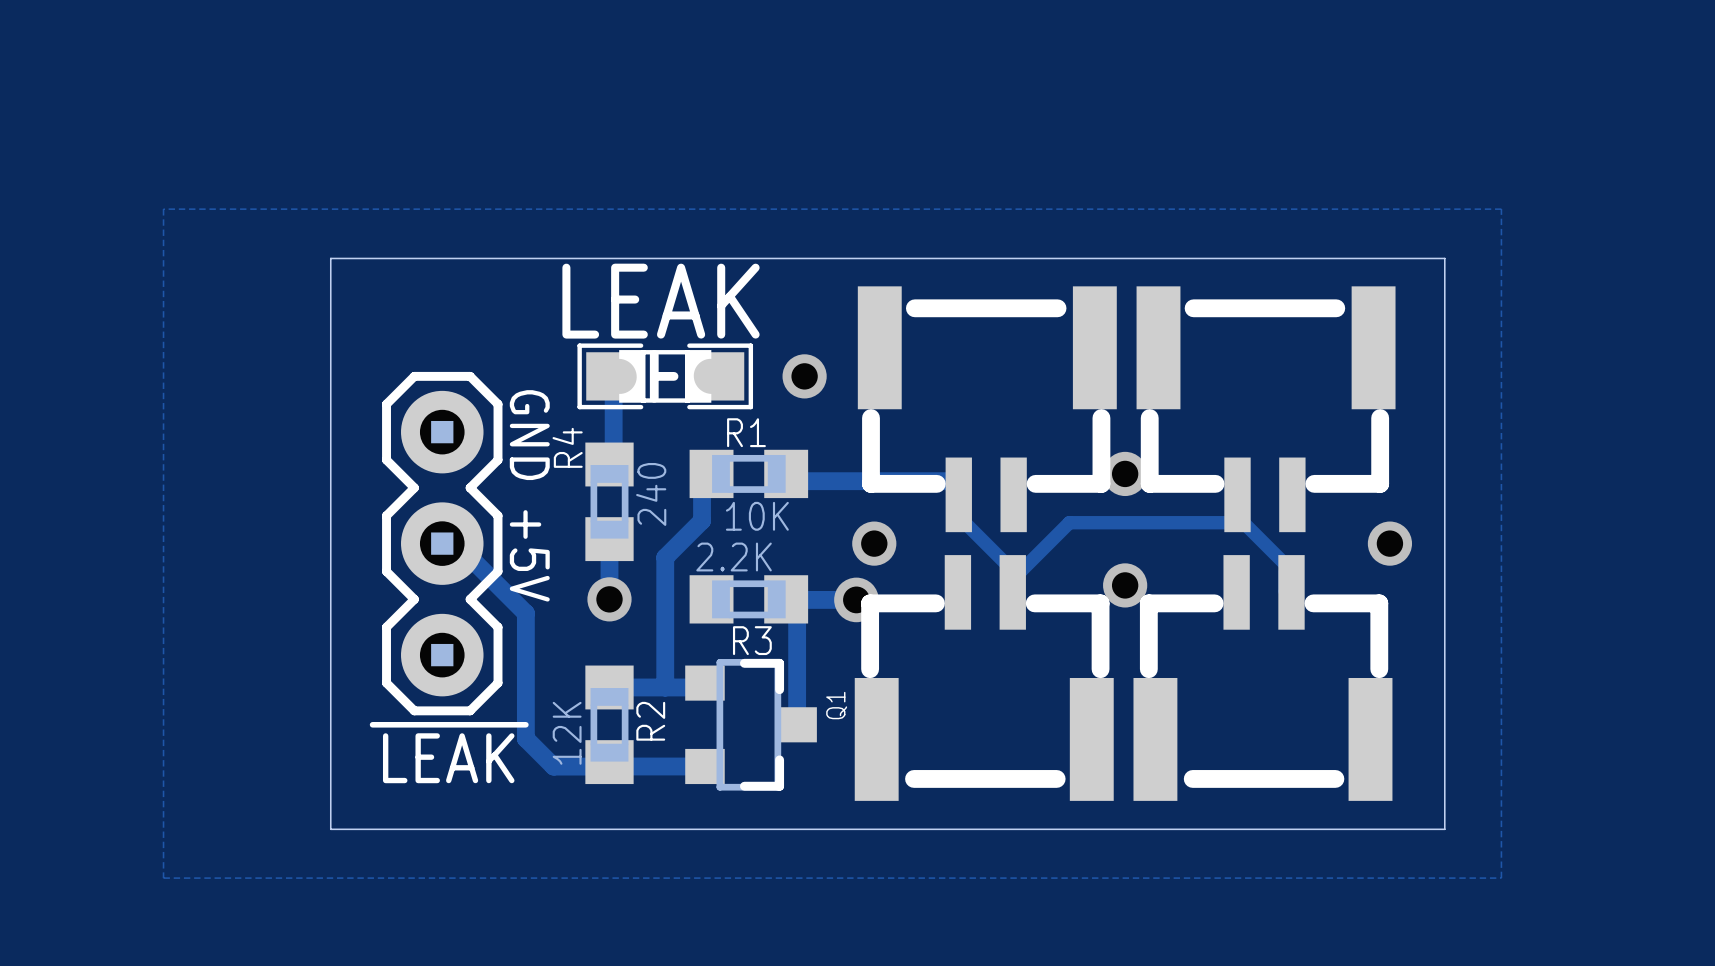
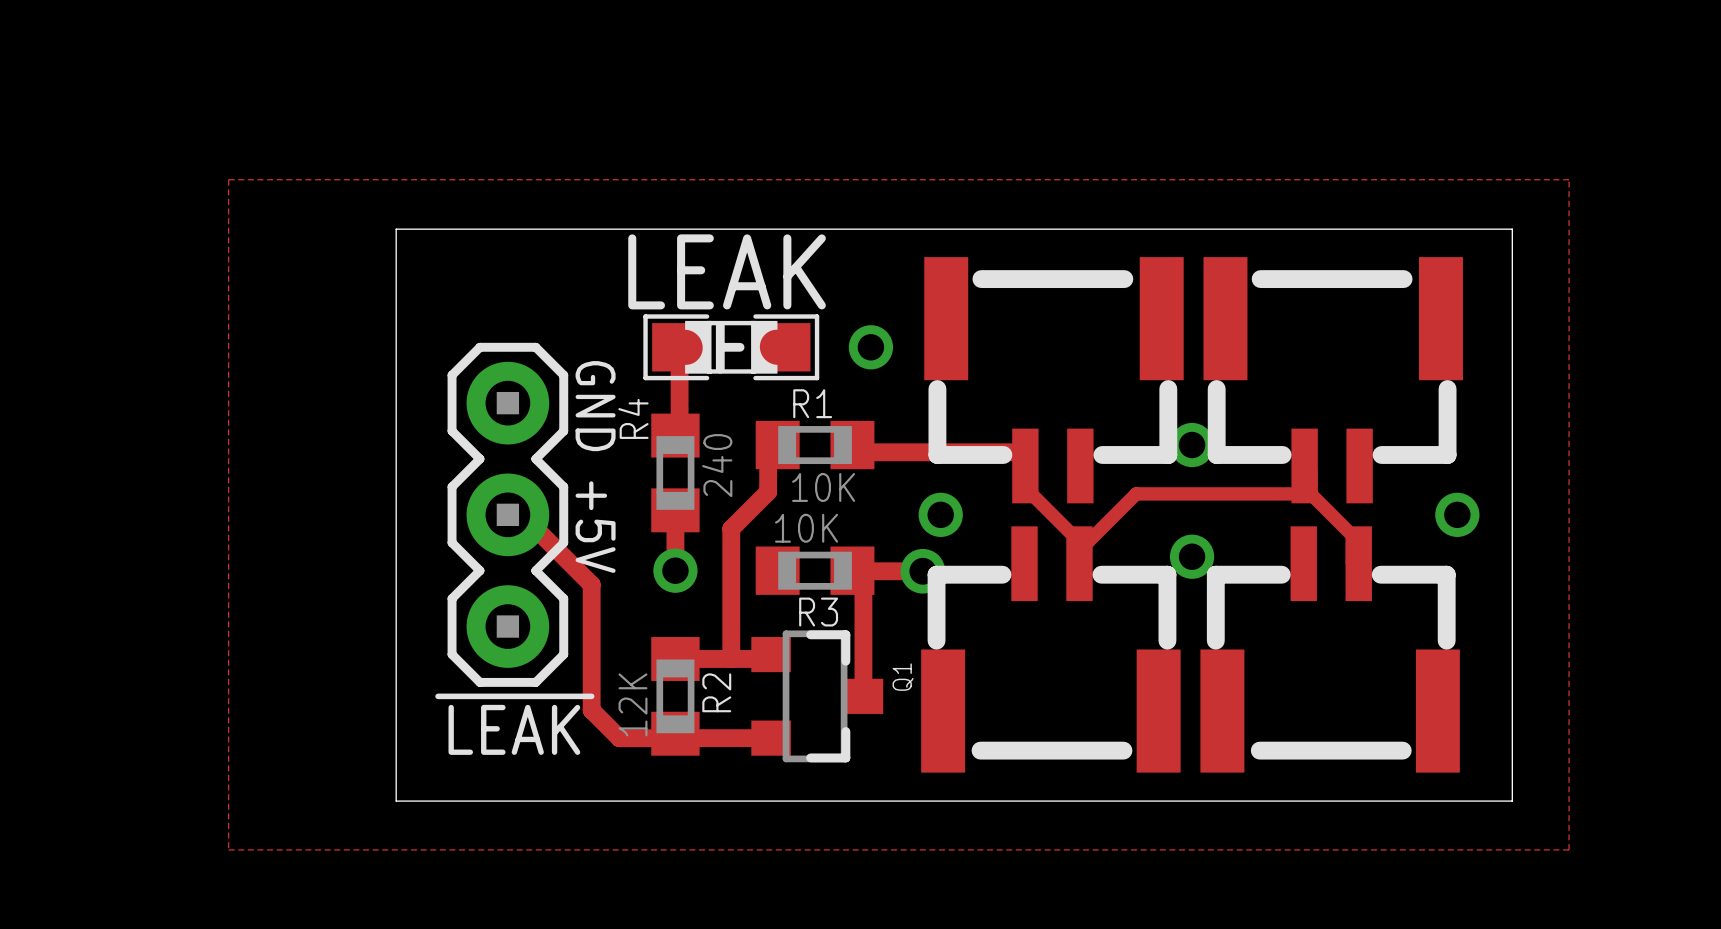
R3 value: 2.2K (734, 556) -> 10K (806, 528)

